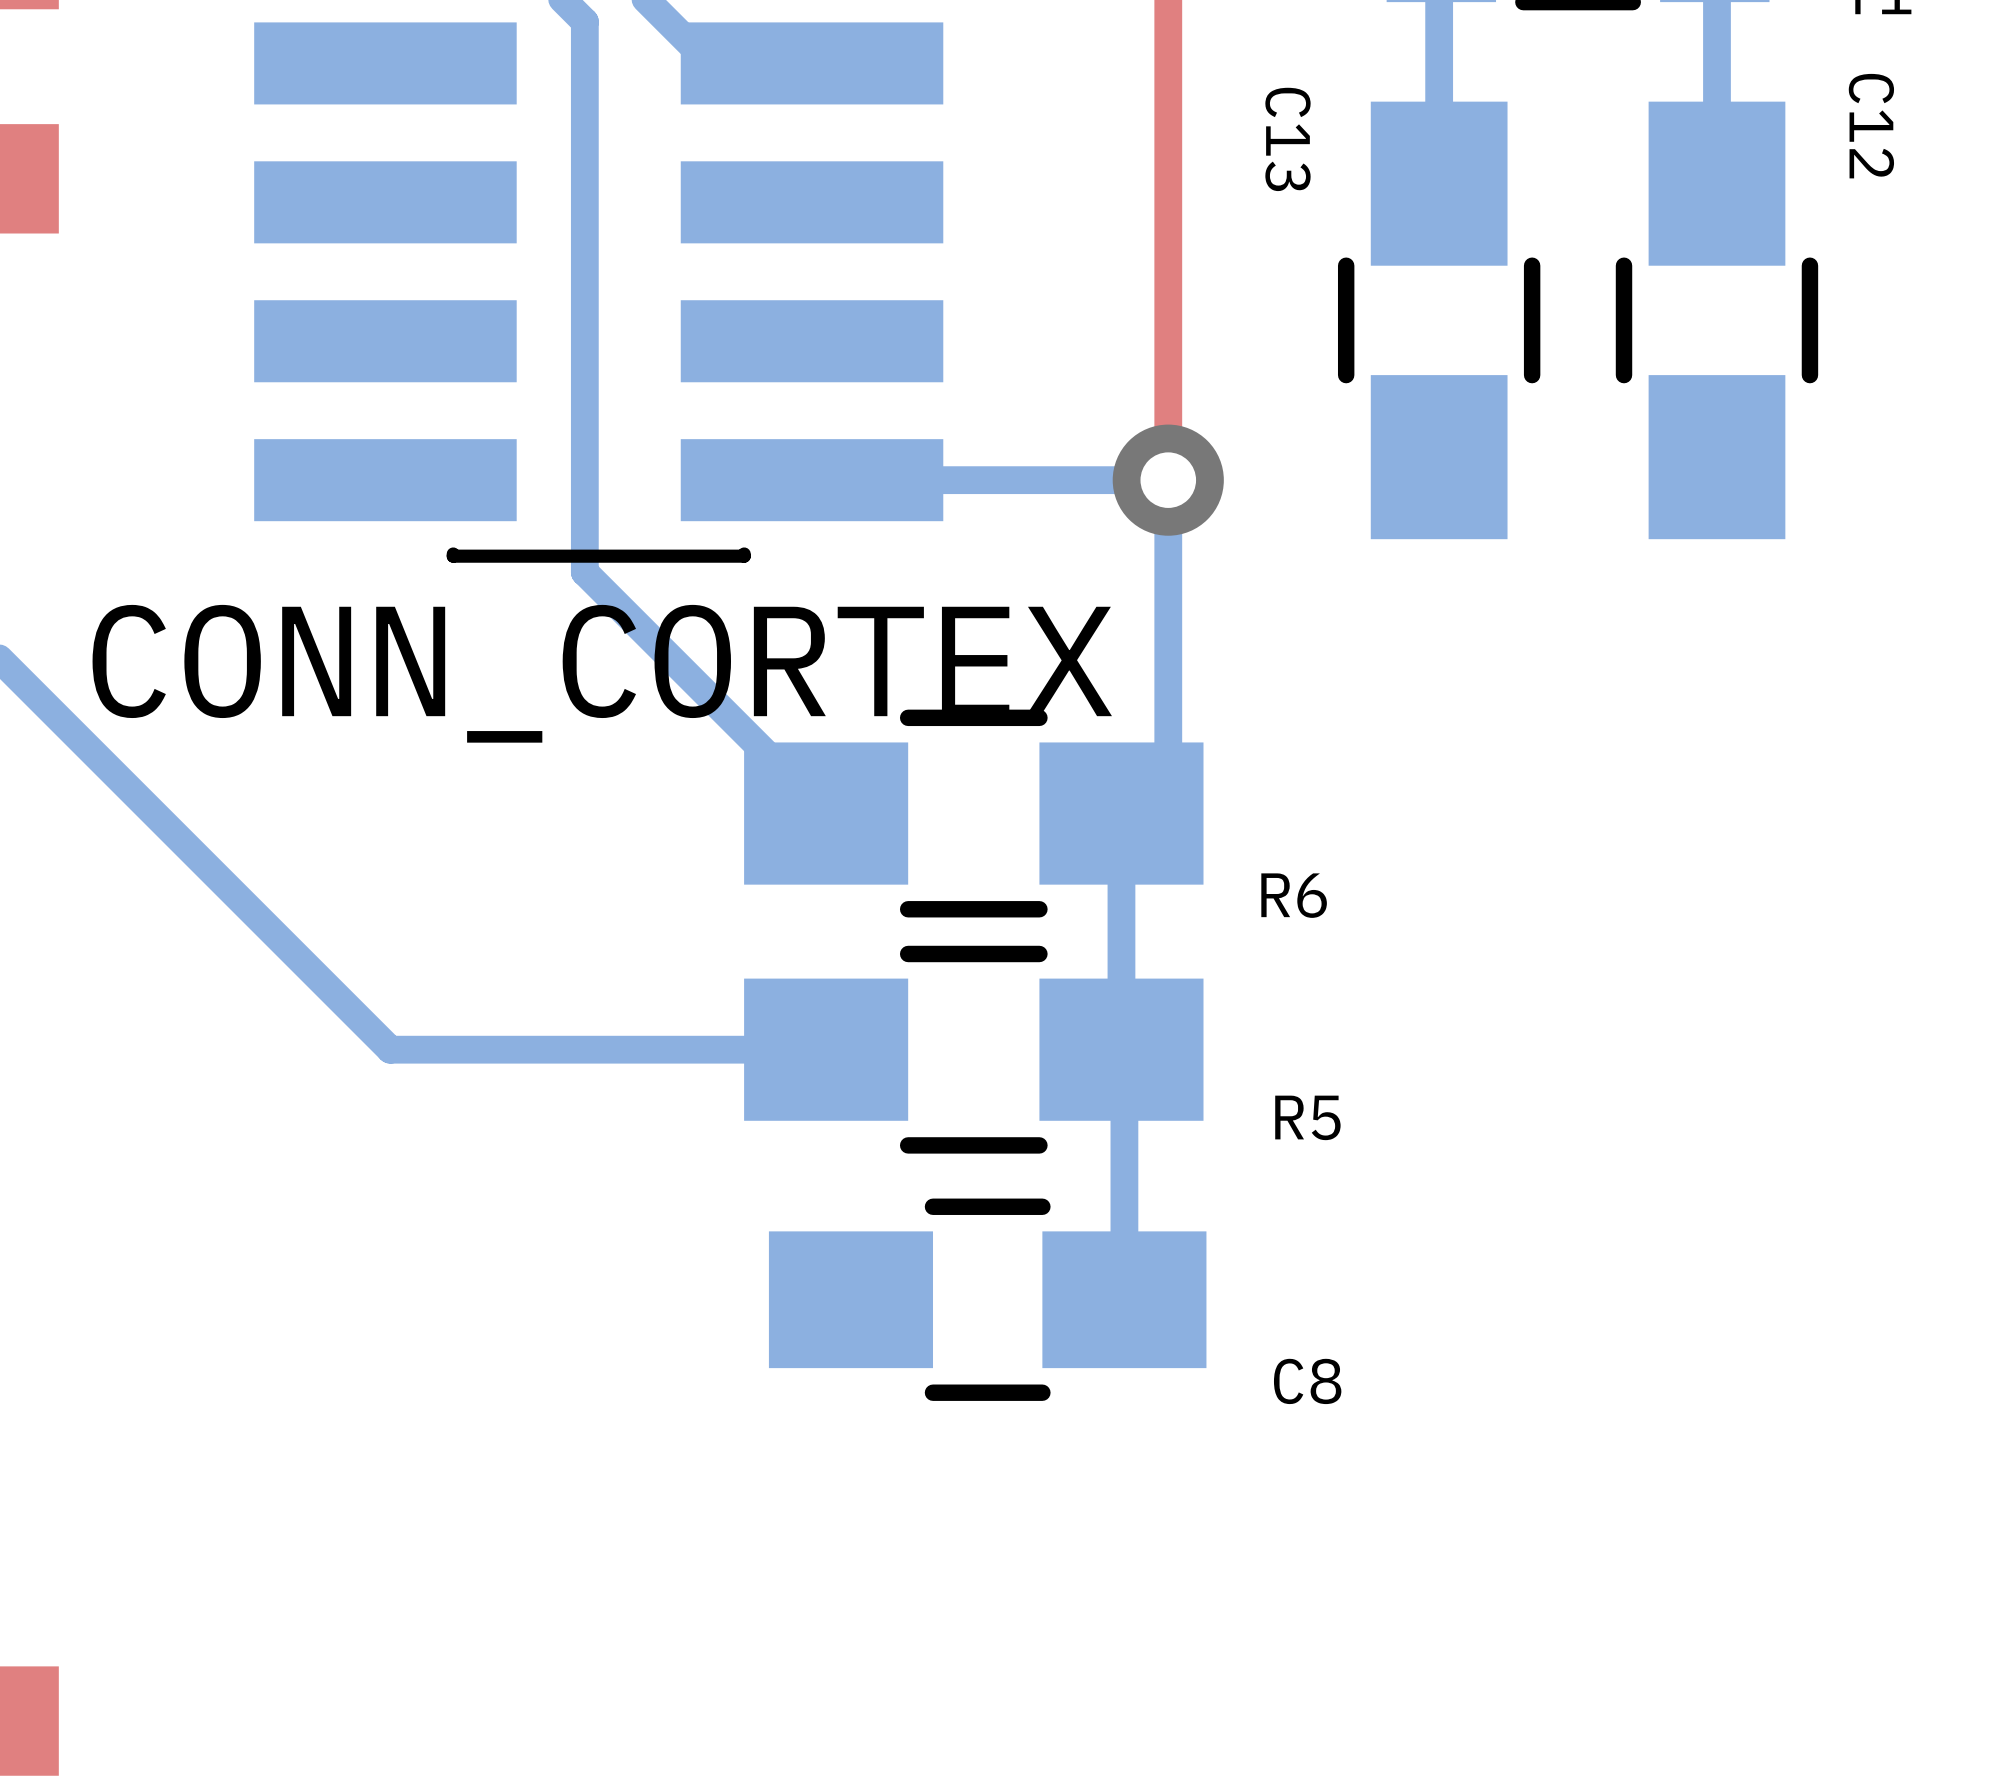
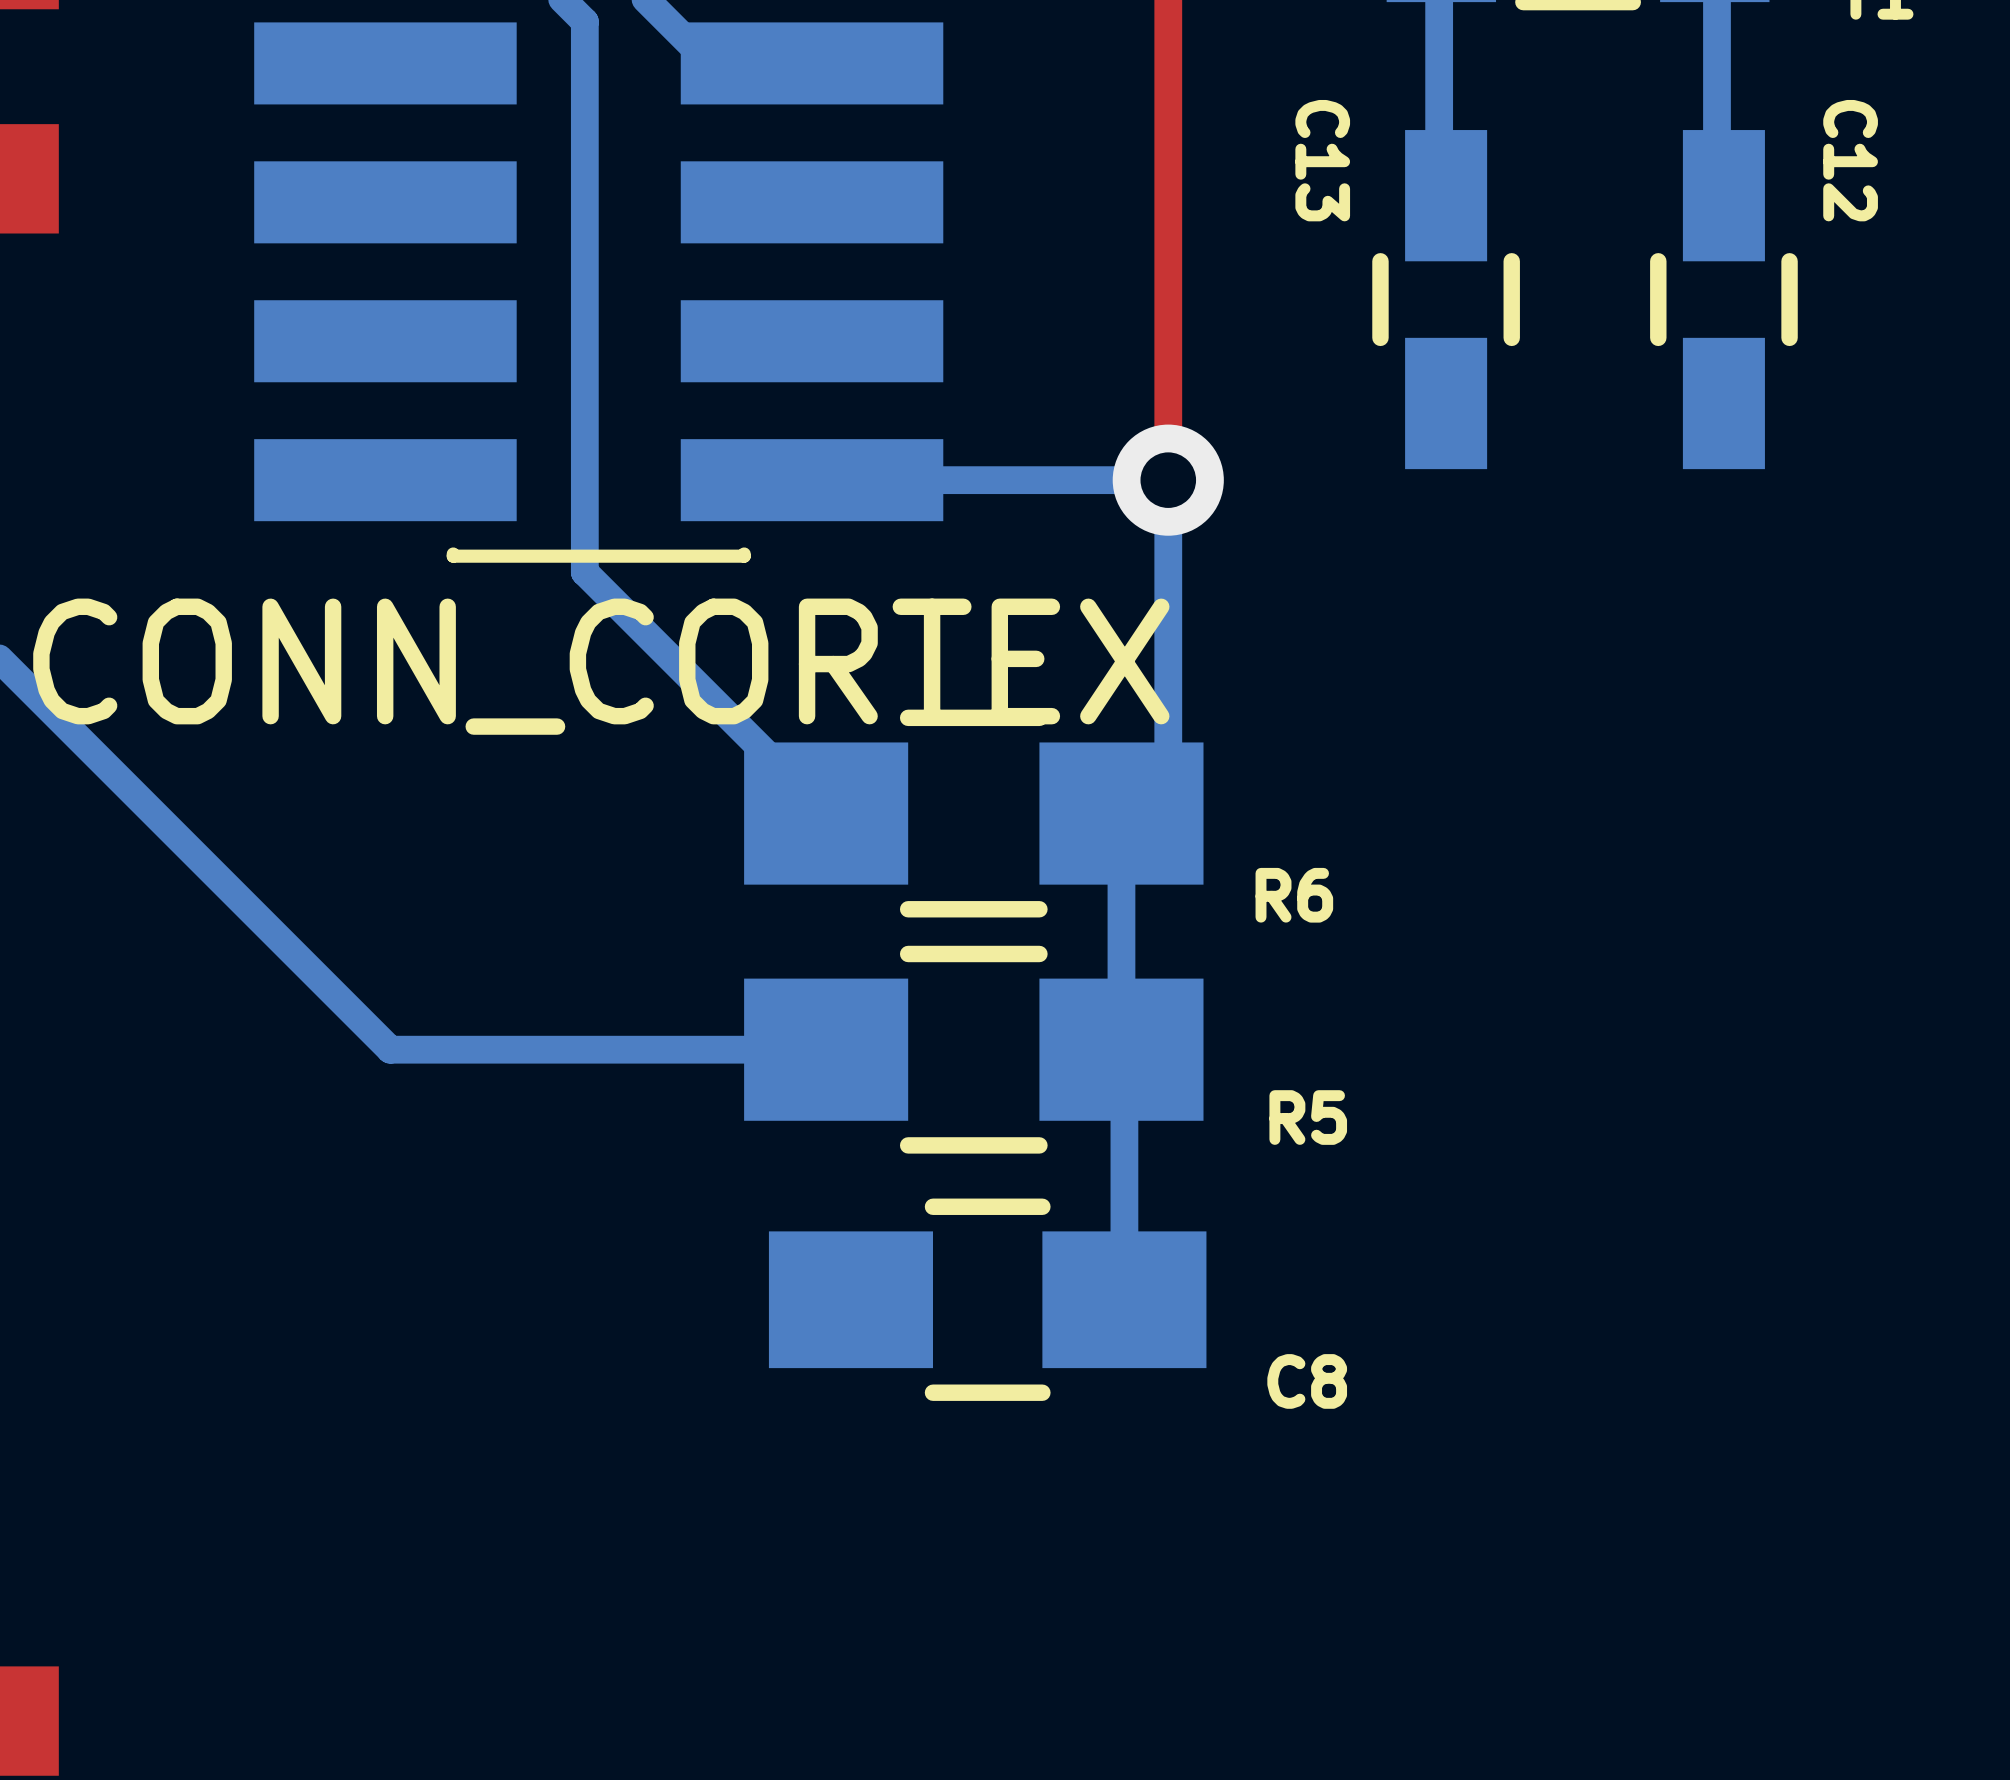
C13 footprint: [1337, 101, 1541, 540] -> [1372, 130, 1520, 470]
C12 footprint: [1615, 101, 1819, 540] -> [1650, 130, 1798, 470]
C12 name position: C12 (1871, 126) -> C12 (1850, 160)
C13 name position: C13 (1287, 139) -> C13 (1322, 160)

